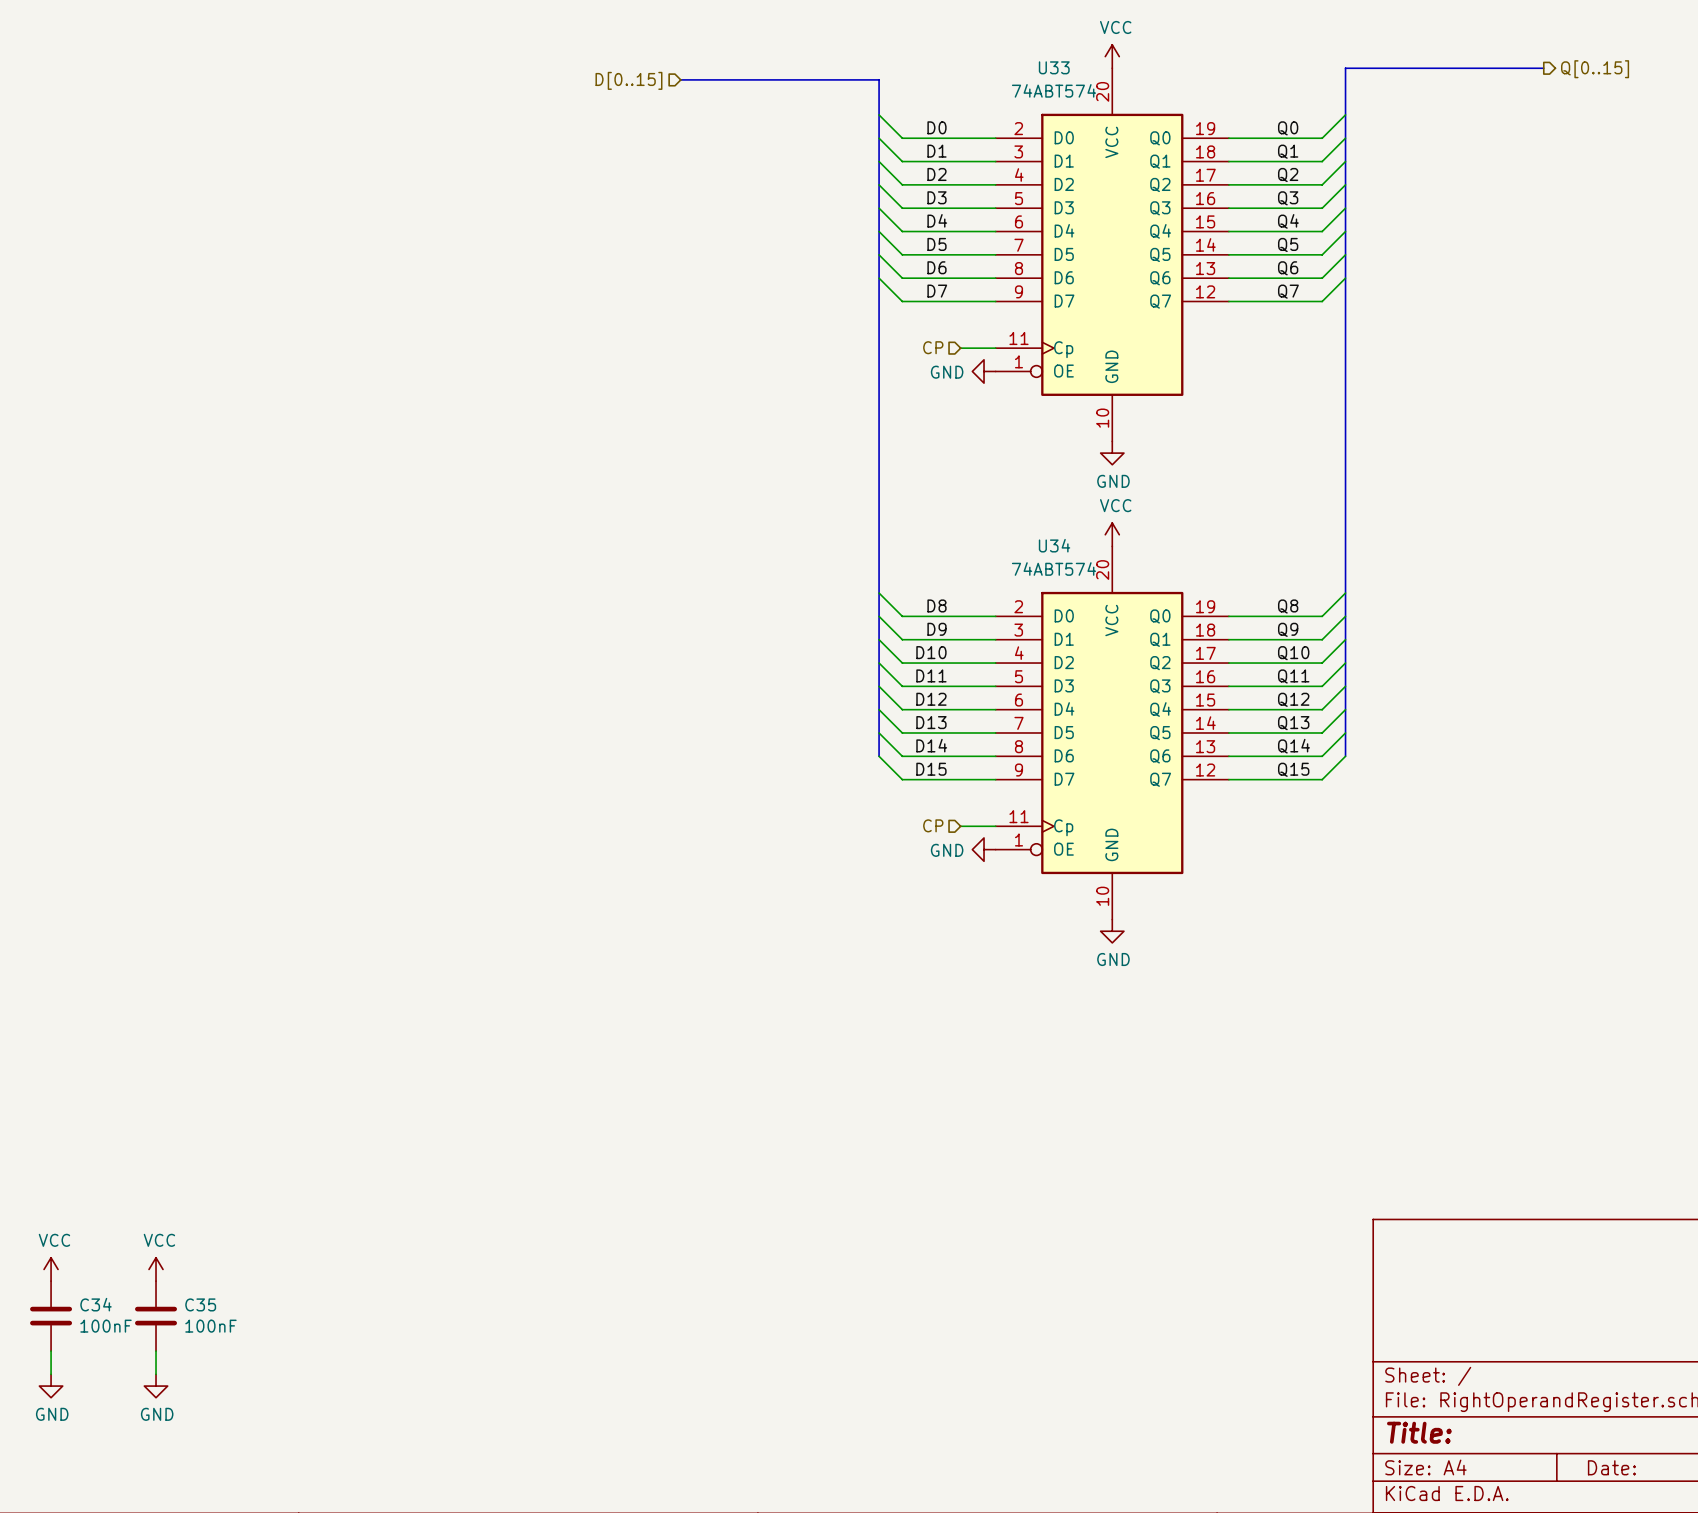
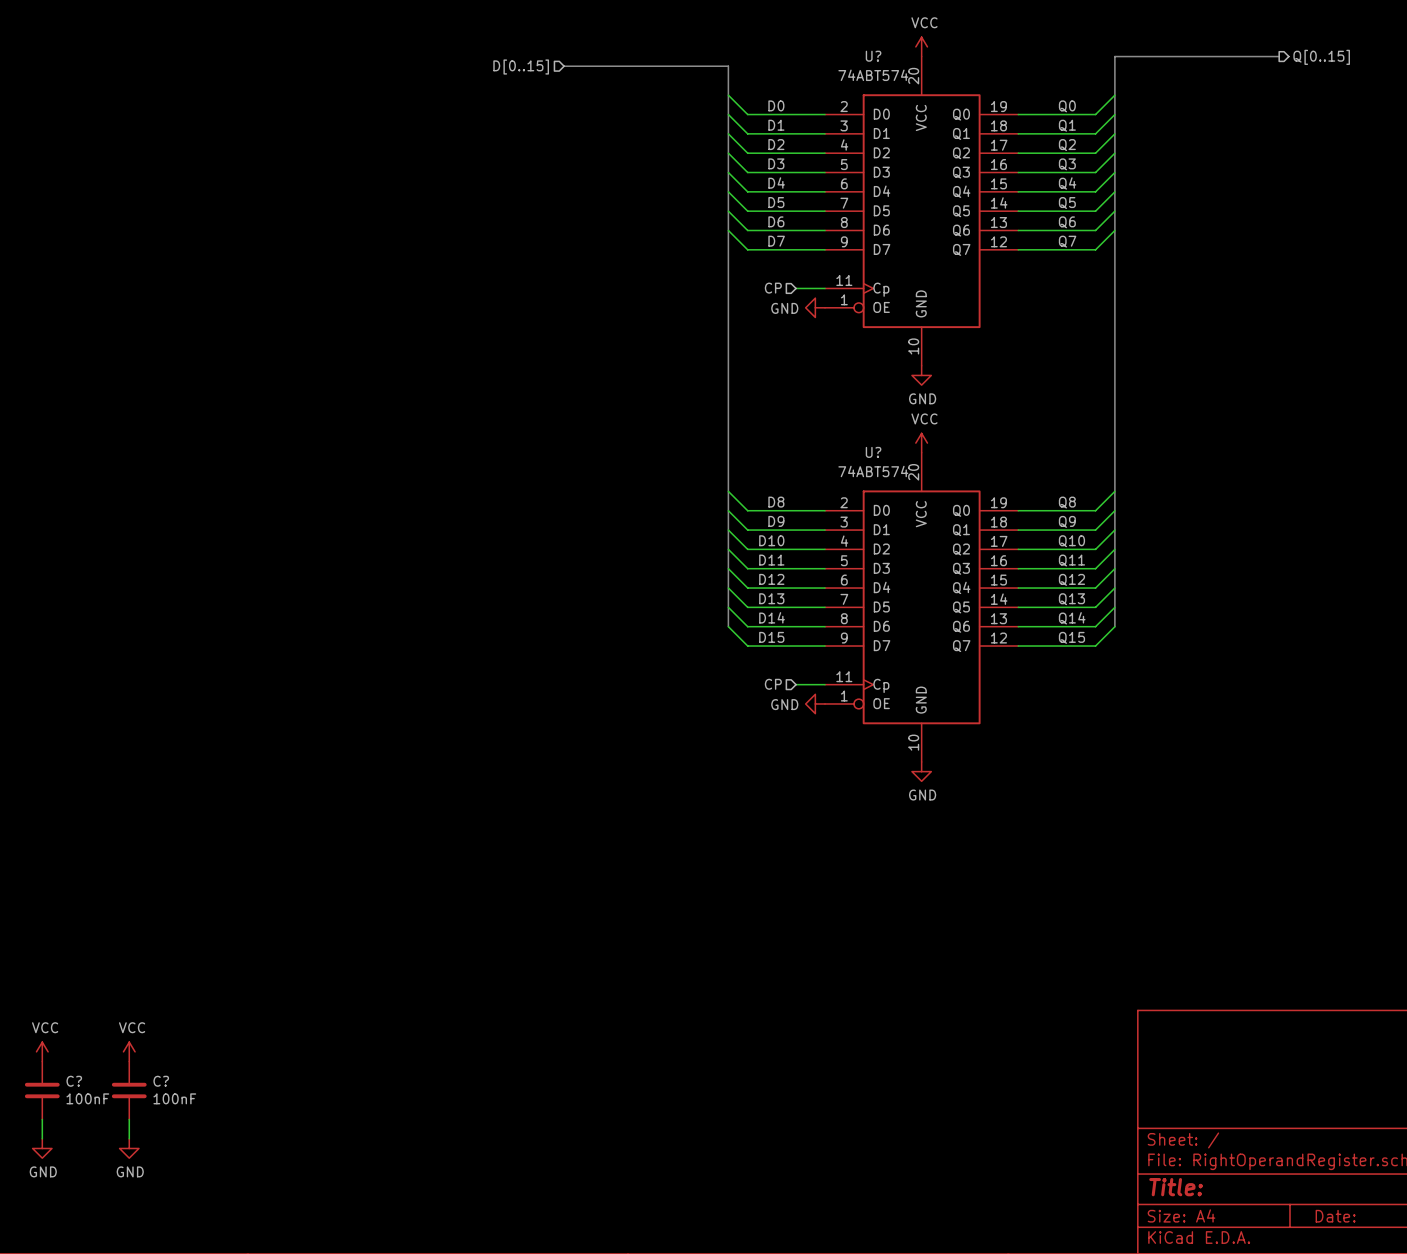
U33 name: U33 (1054, 67) -> U? (873, 56)
U34 name: U34 (1054, 545) -> U? (873, 452)
C34 name: C34 (96, 1304) -> C? (74, 1081)
C35 name: C35 (200, 1304) -> C? (161, 1081)

